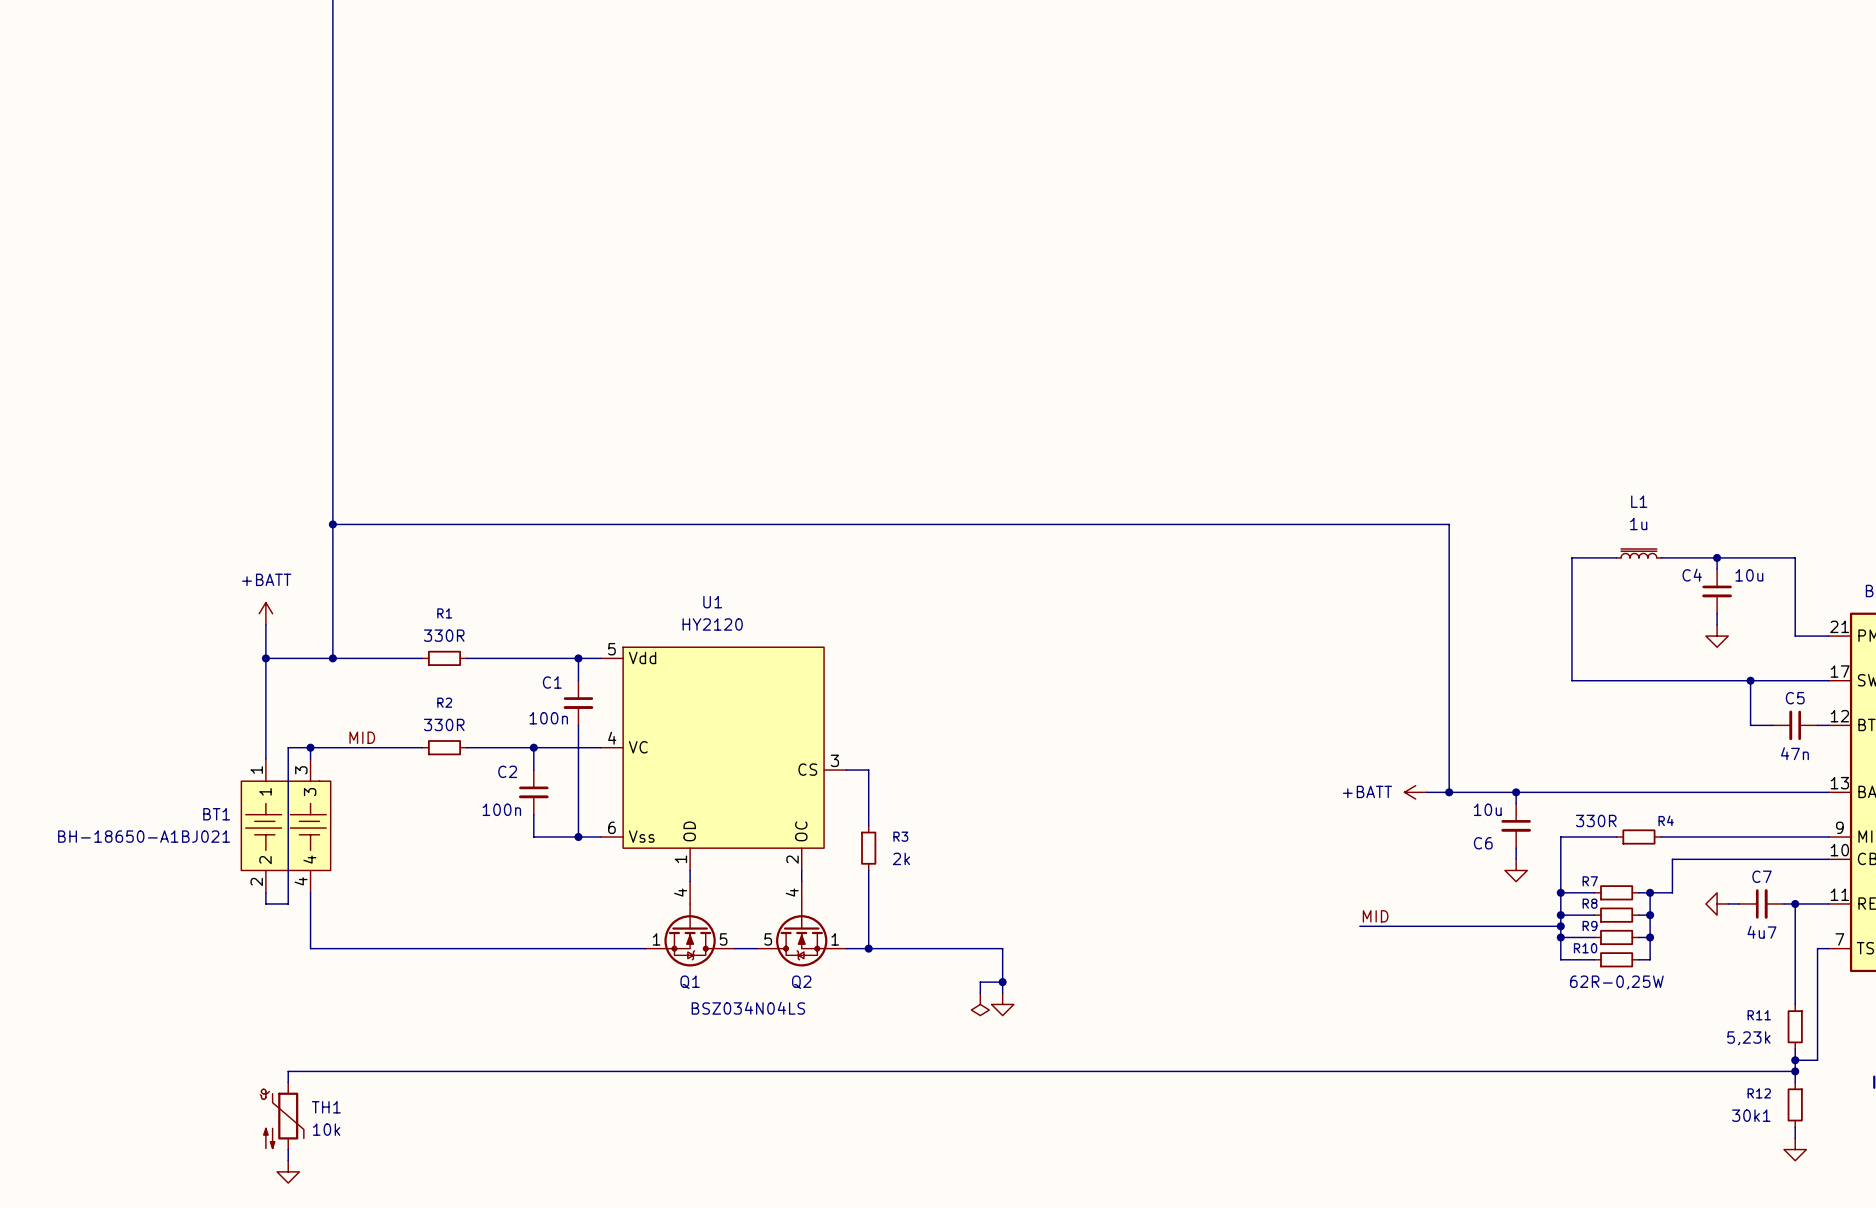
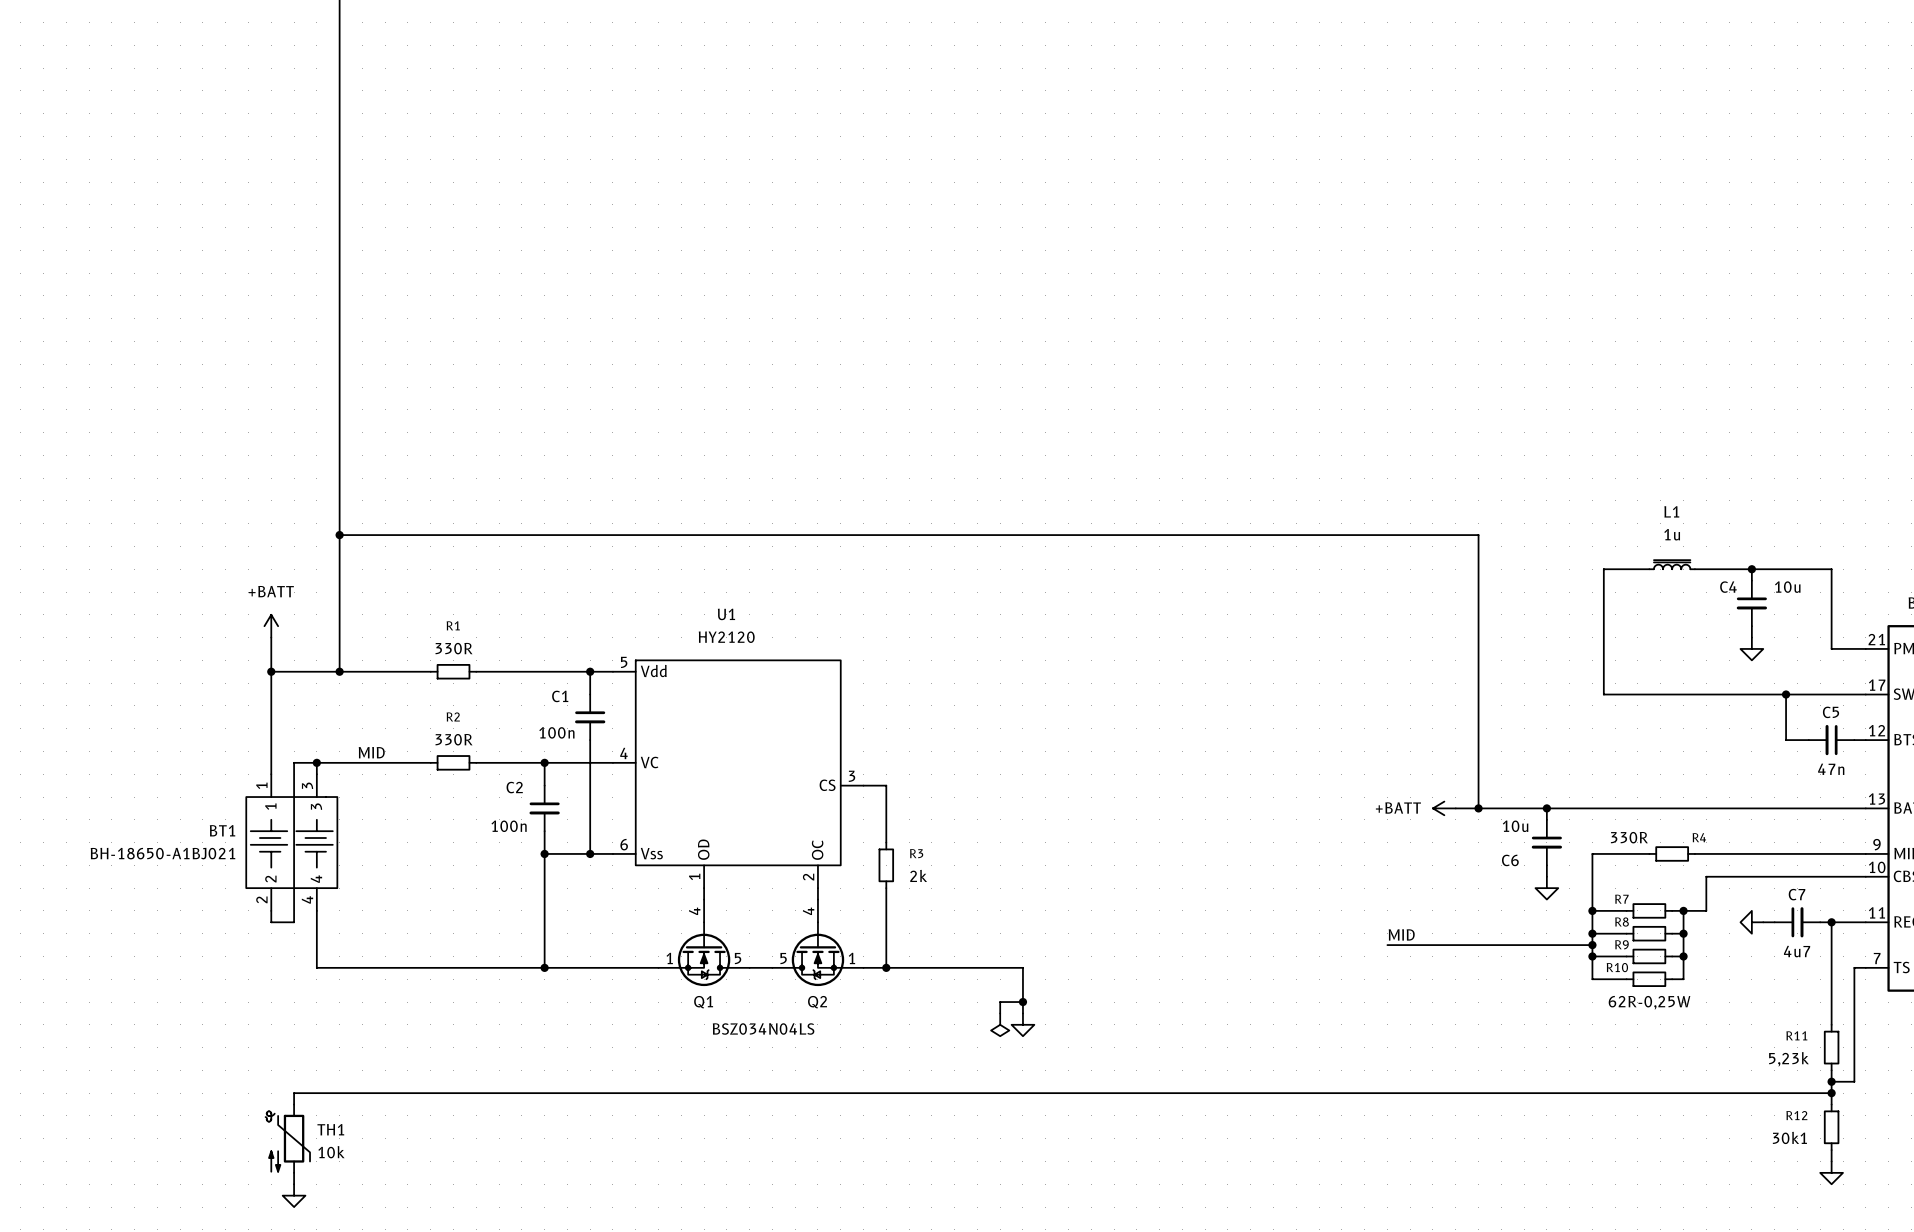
wire: none -> (544, 853) (544, 967)
junction: none -> (544, 853)
junction: none -> (544, 967)

